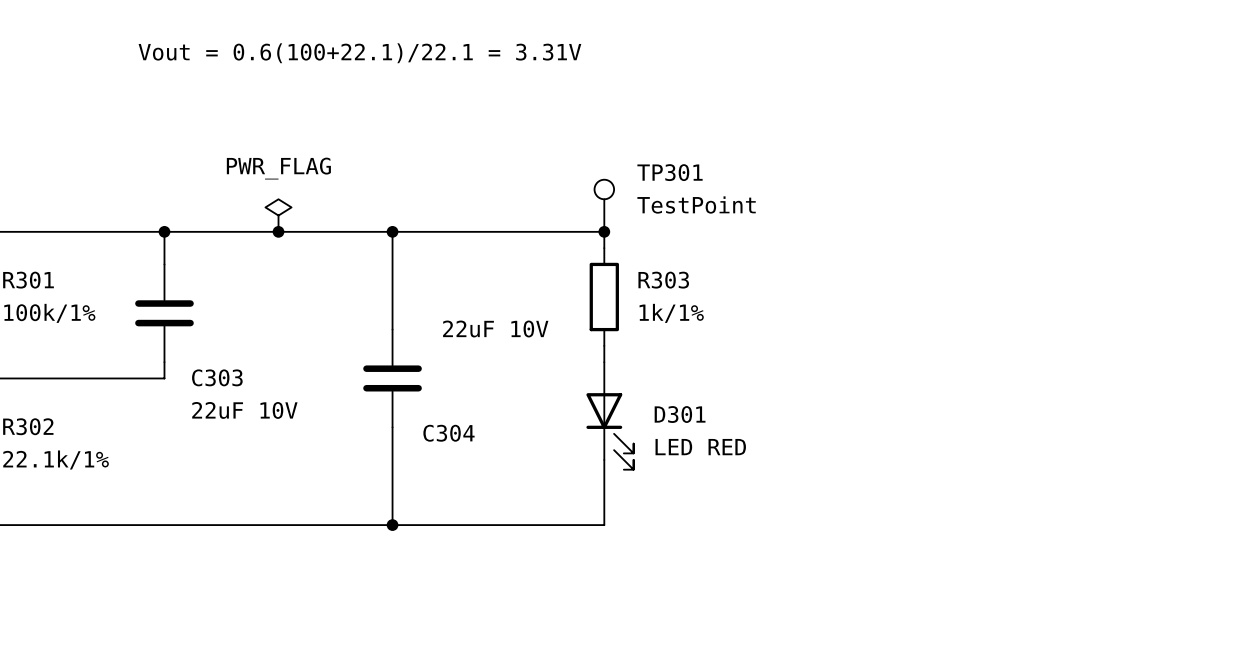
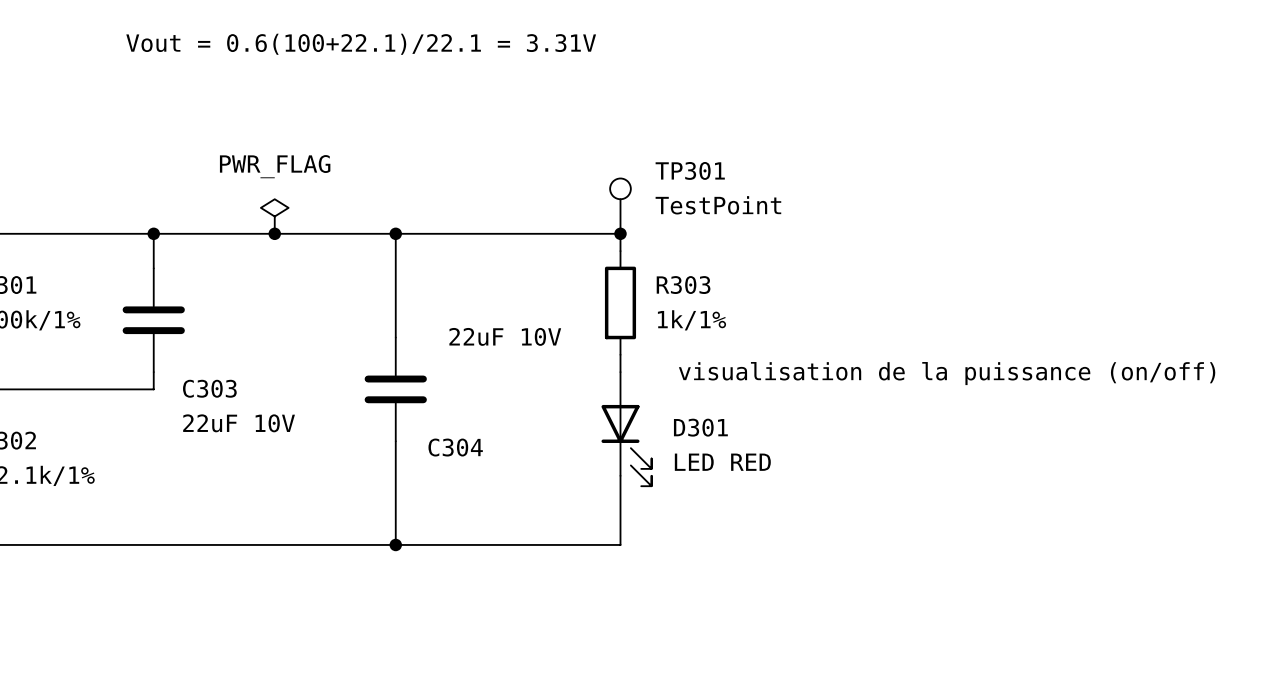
text: none -> visualisation de la puissance (on/off) (947, 373)

